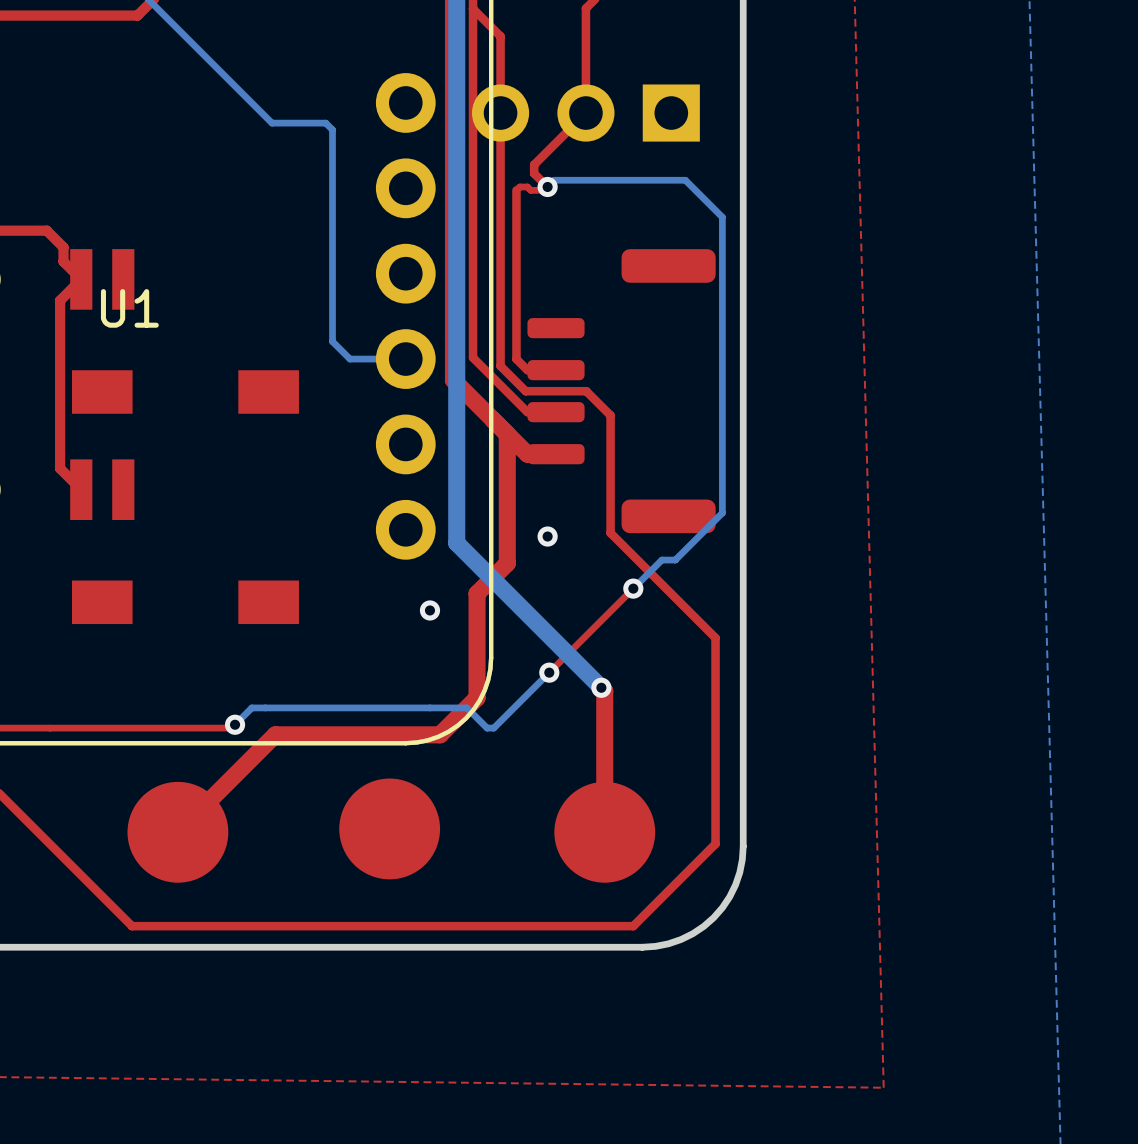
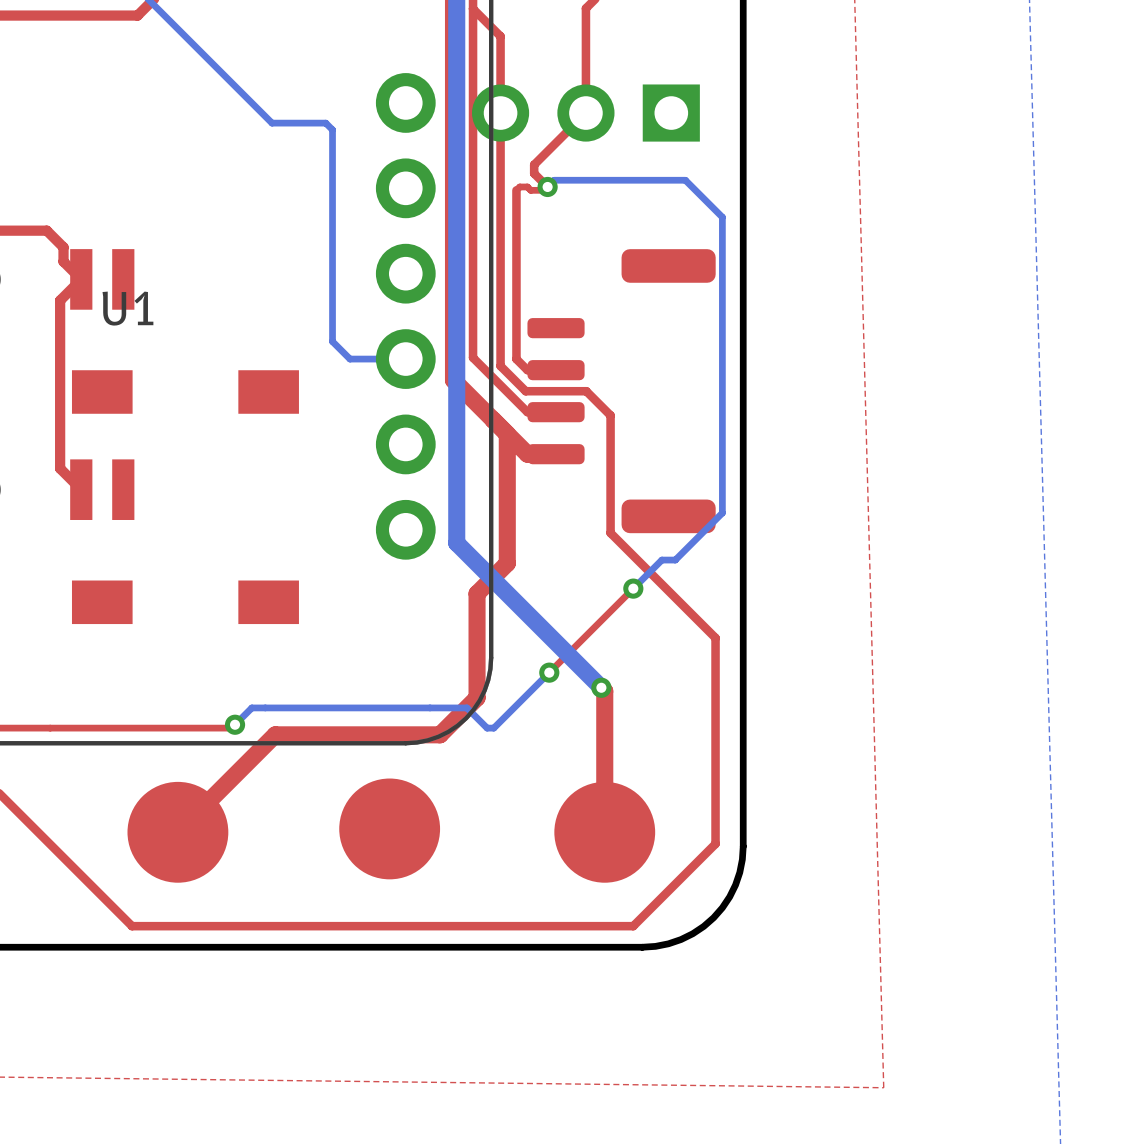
via: (547, 536) -> none
via: (429, 610) -> none

